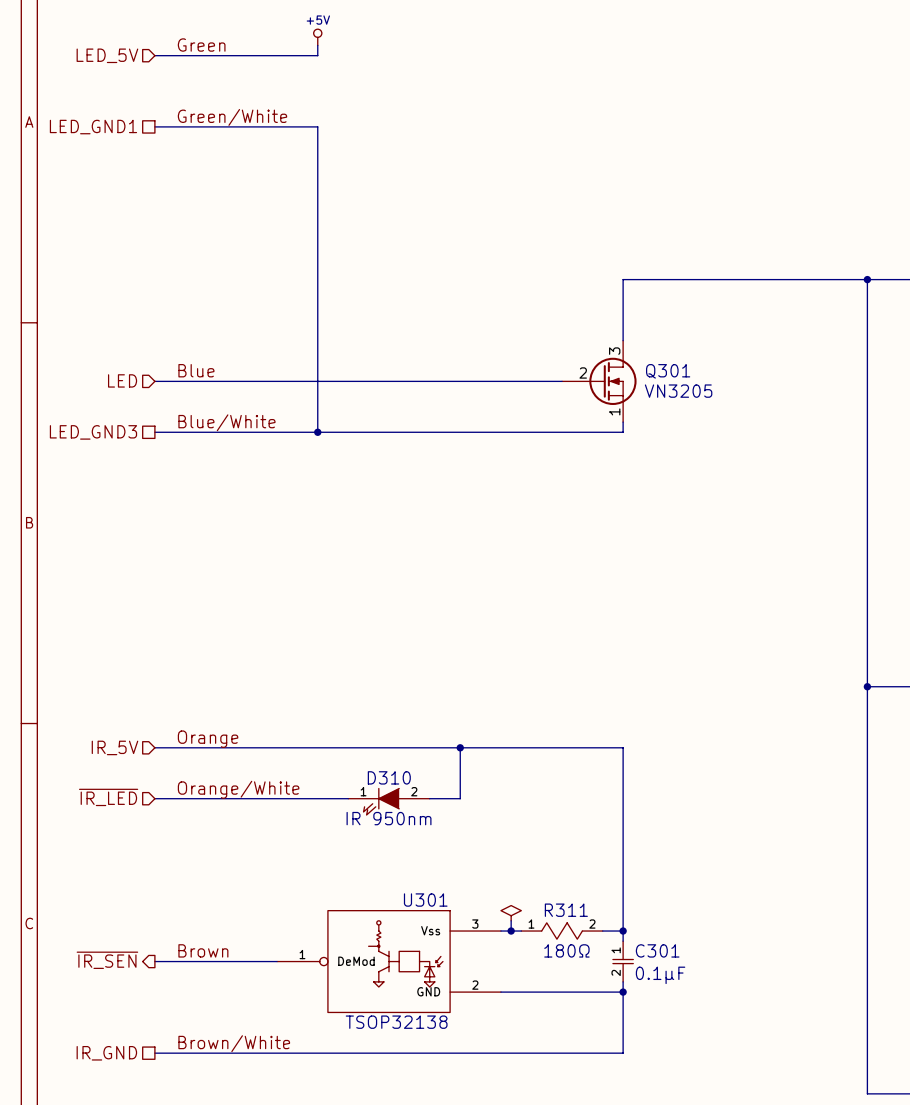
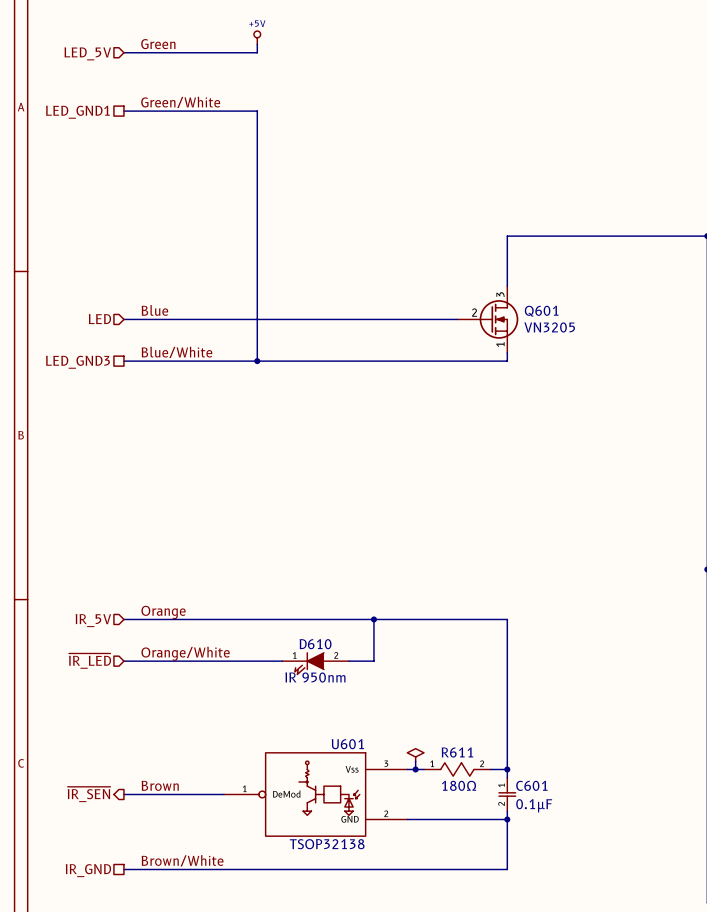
Q301 name: Q301 (668, 371) -> Q601 (541, 311)
D310 name: D310 (389, 777) -> D610 (315, 644)
U301 name: U301 (425, 900) -> U601 (347, 744)
R311 name: R311 (566, 910) -> R611 (457, 752)
C301 name: C301 (657, 950) -> C601 (531, 785)

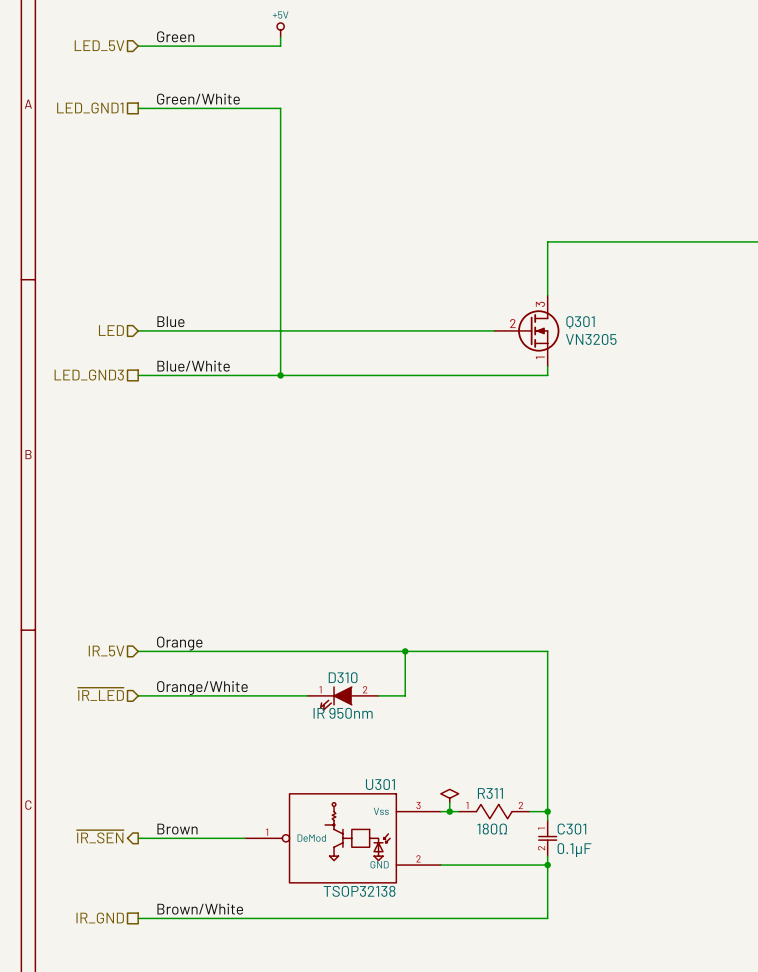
Q601 name: Q601 (541, 311) -> Q301 (580, 322)
D610 name: D610 (315, 644) -> D310 (343, 677)
U601 name: U601 (347, 744) -> U301 (380, 784)
R611 name: R611 (457, 752) -> R311 (490, 793)
C601 name: C601 (531, 785) -> C301 (571, 829)

